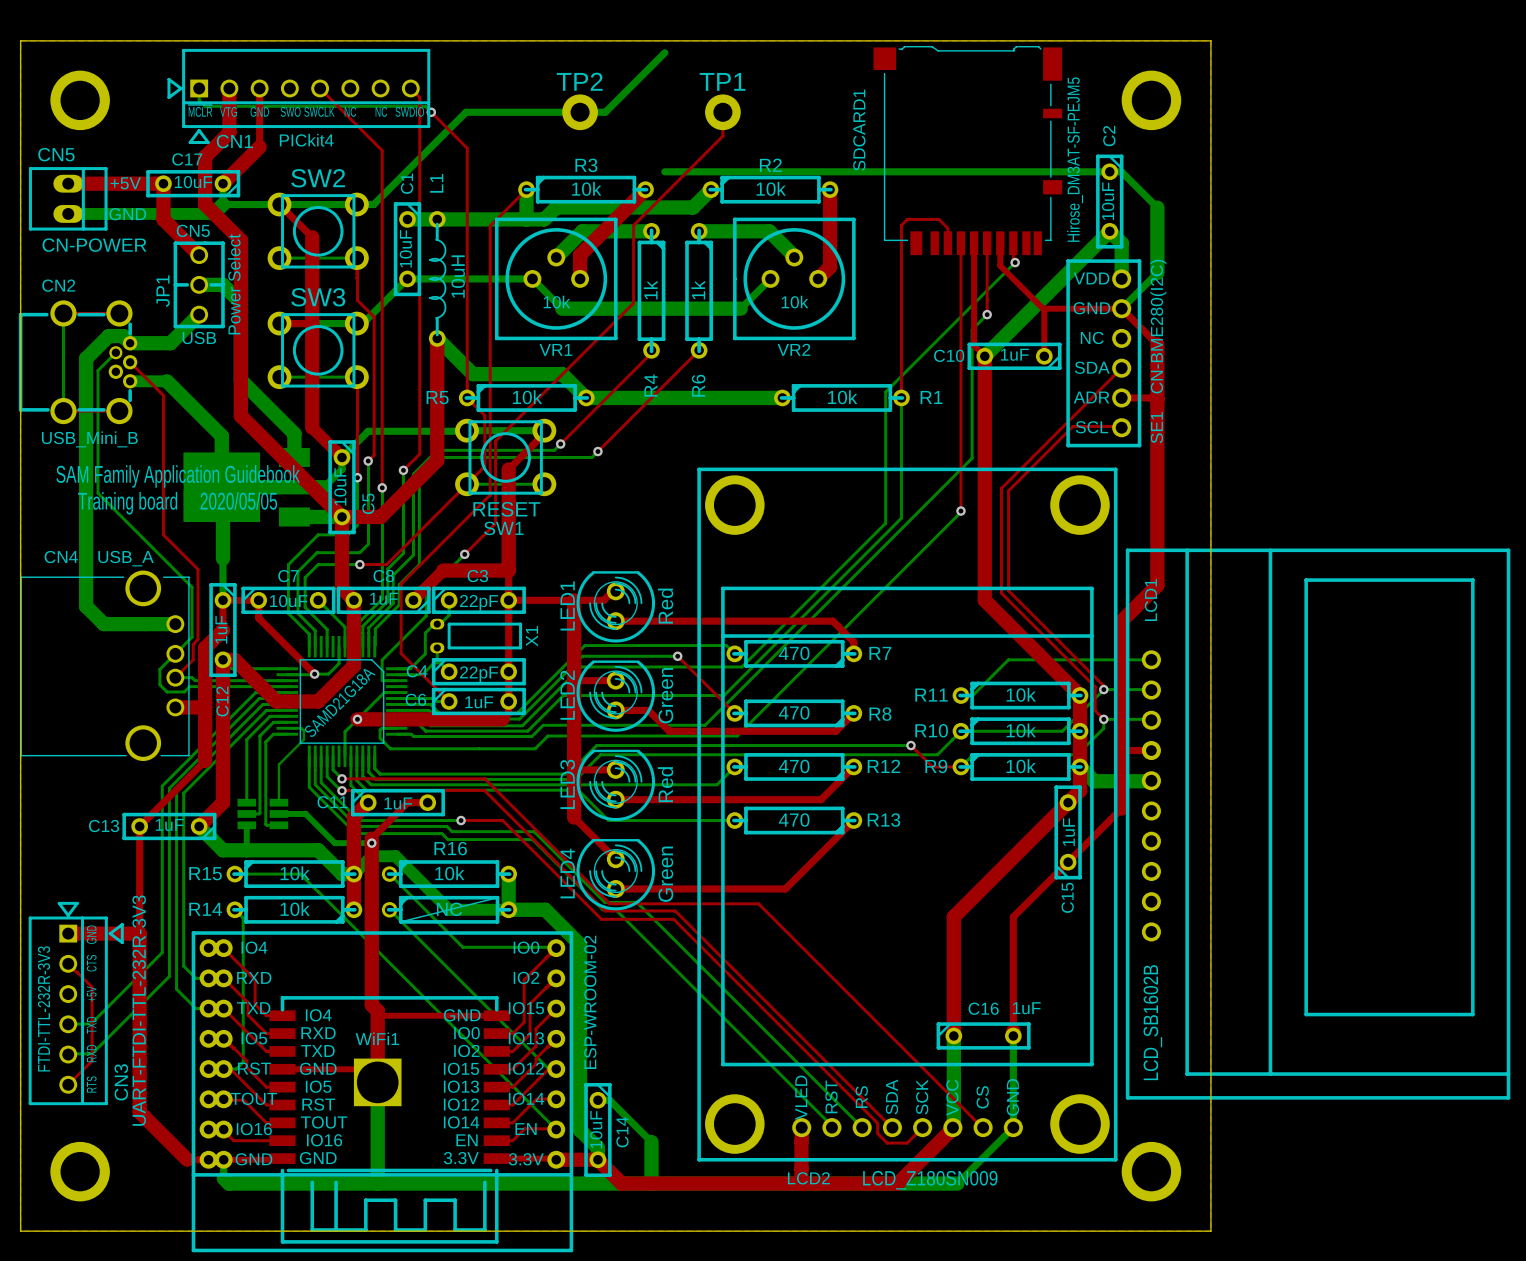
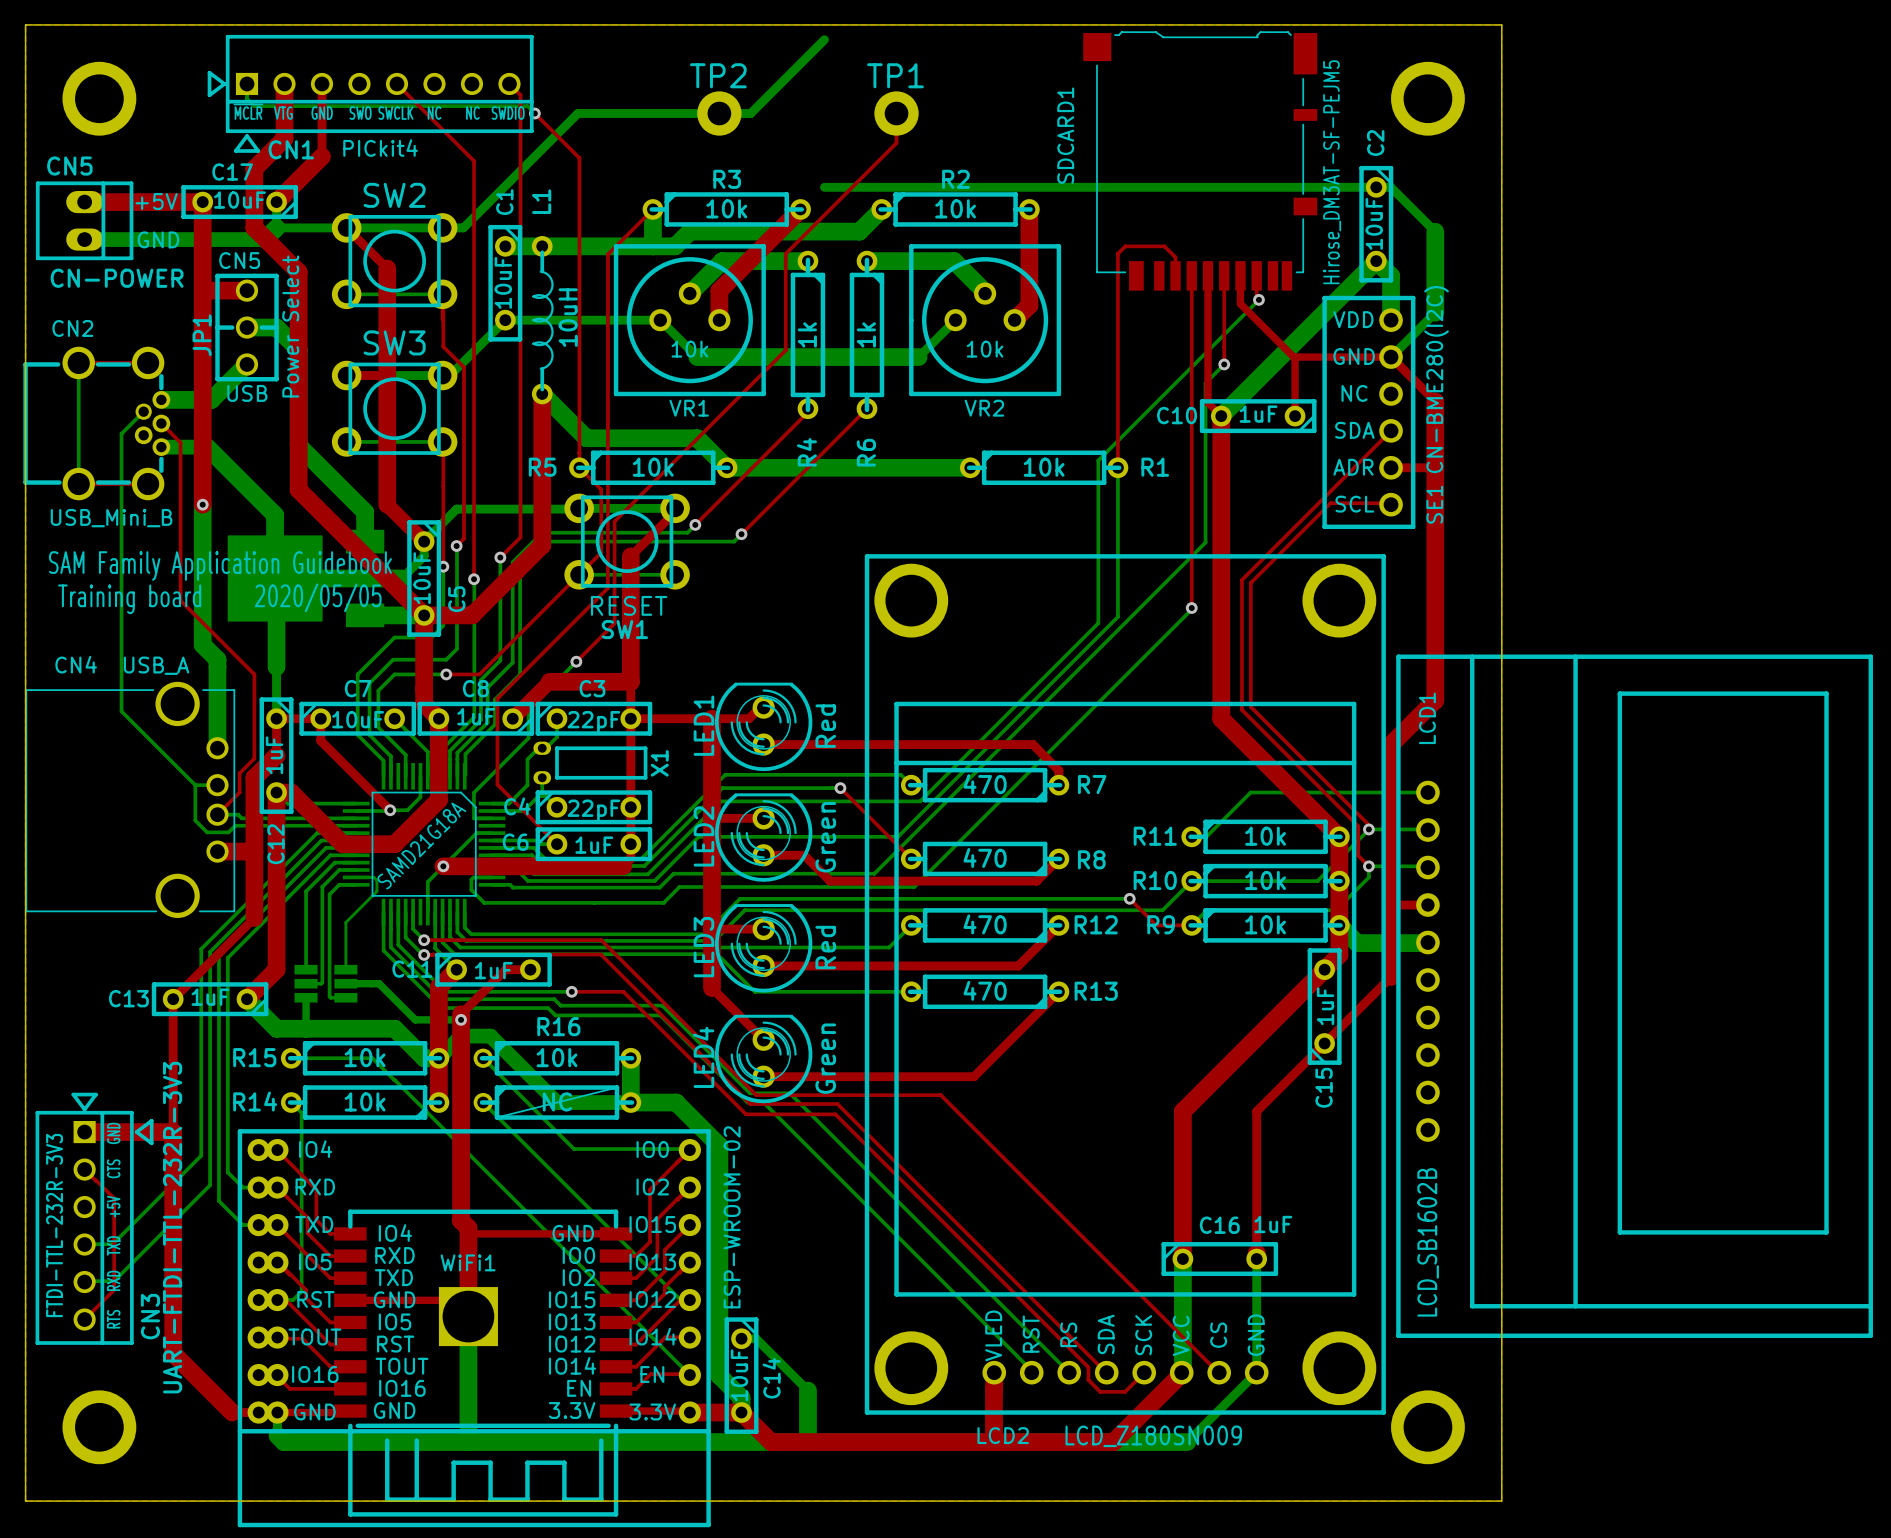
top track: (163, 219) (199, 255) -> (202, 290) (247, 290)
bottom track: (130, 343) (123, 336) (108, 336) (86, 358) (86, 606) (103, 624) (175, 624) -> (202, 504) (202, 644) (217, 659) (217, 748)
top track: (145, 377) (163, 395) -> (202, 246) (202, 464)
top track width: thin (163, 395) (163, 427) -> thick (202, 464) (202, 504)
top track: (163, 427) (163, 534) (197, 569) (197, 639) -> (180, 442) (180, 600) (254, 674) (254, 758) (245, 767)
via: none -> (202, 504)
bottom track: (98, 493) (192, 587) (192, 637) (159, 669) (159, 684) -> (121, 585) (121, 711) (195, 785)
bottom track: none -> (195, 785) (217, 785)
bottom track: none -> (195, 785) (195, 820) (198, 823)

